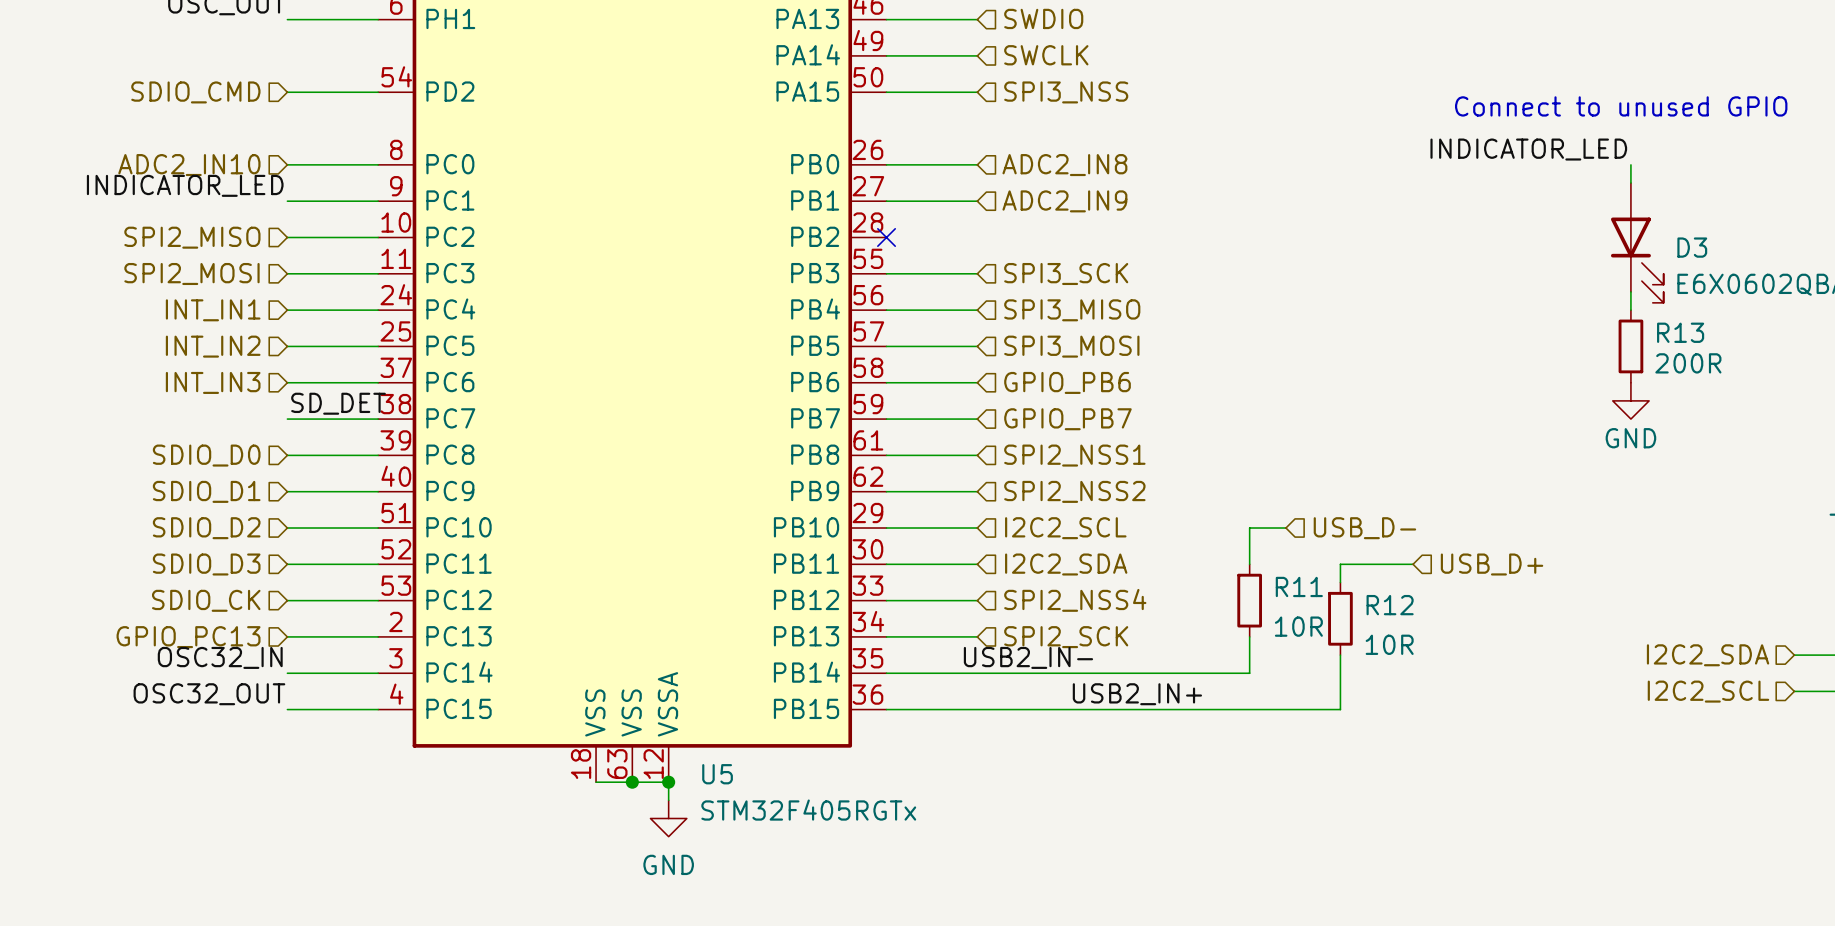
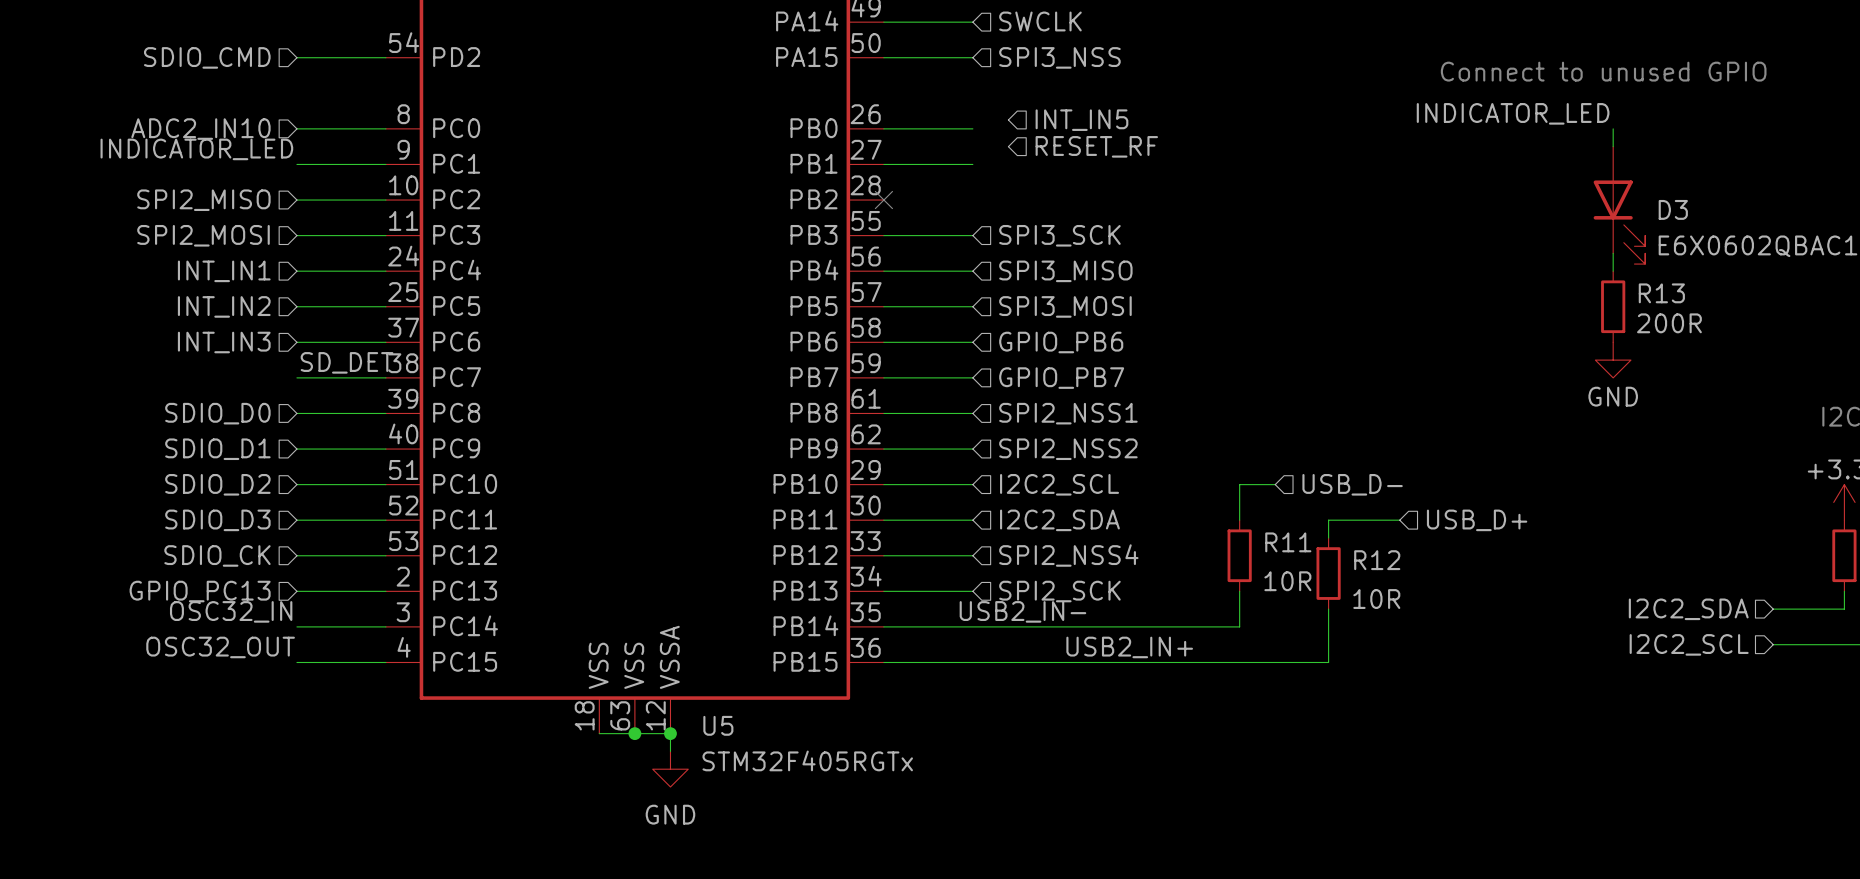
hierarchical label: none -> INT_IN5 (1081, 120)
hierarchical label: ADC2_IN8 (1064, 165) -> none
hierarchical label: none -> RESET_RF (1096, 146)
hierarchical label: ADC2_IN9 (1064, 201) -> none

